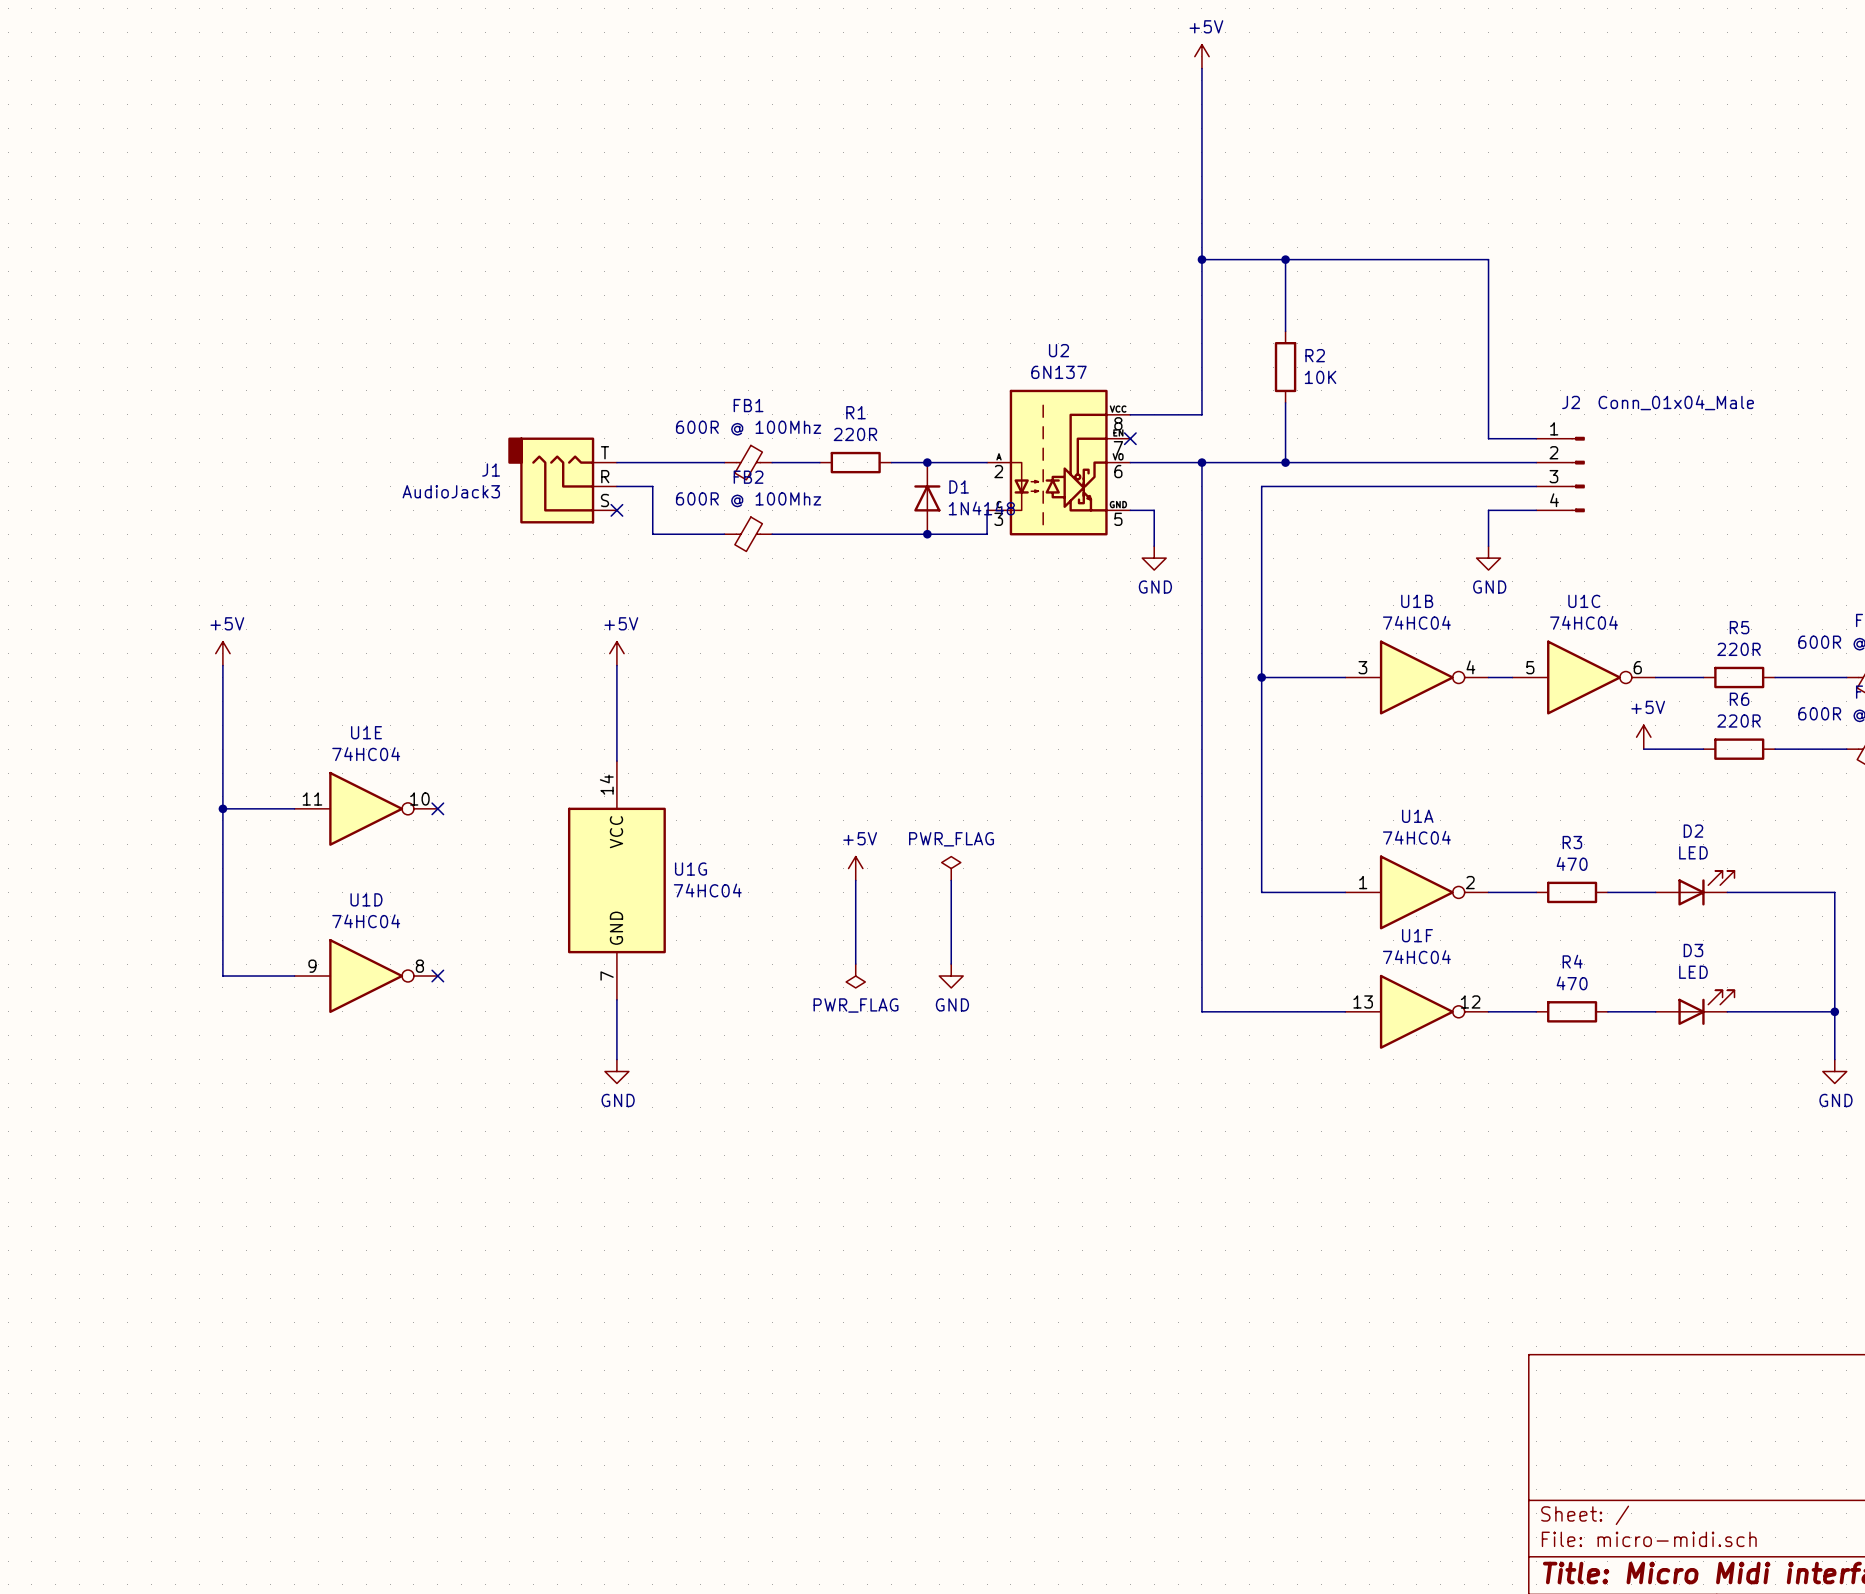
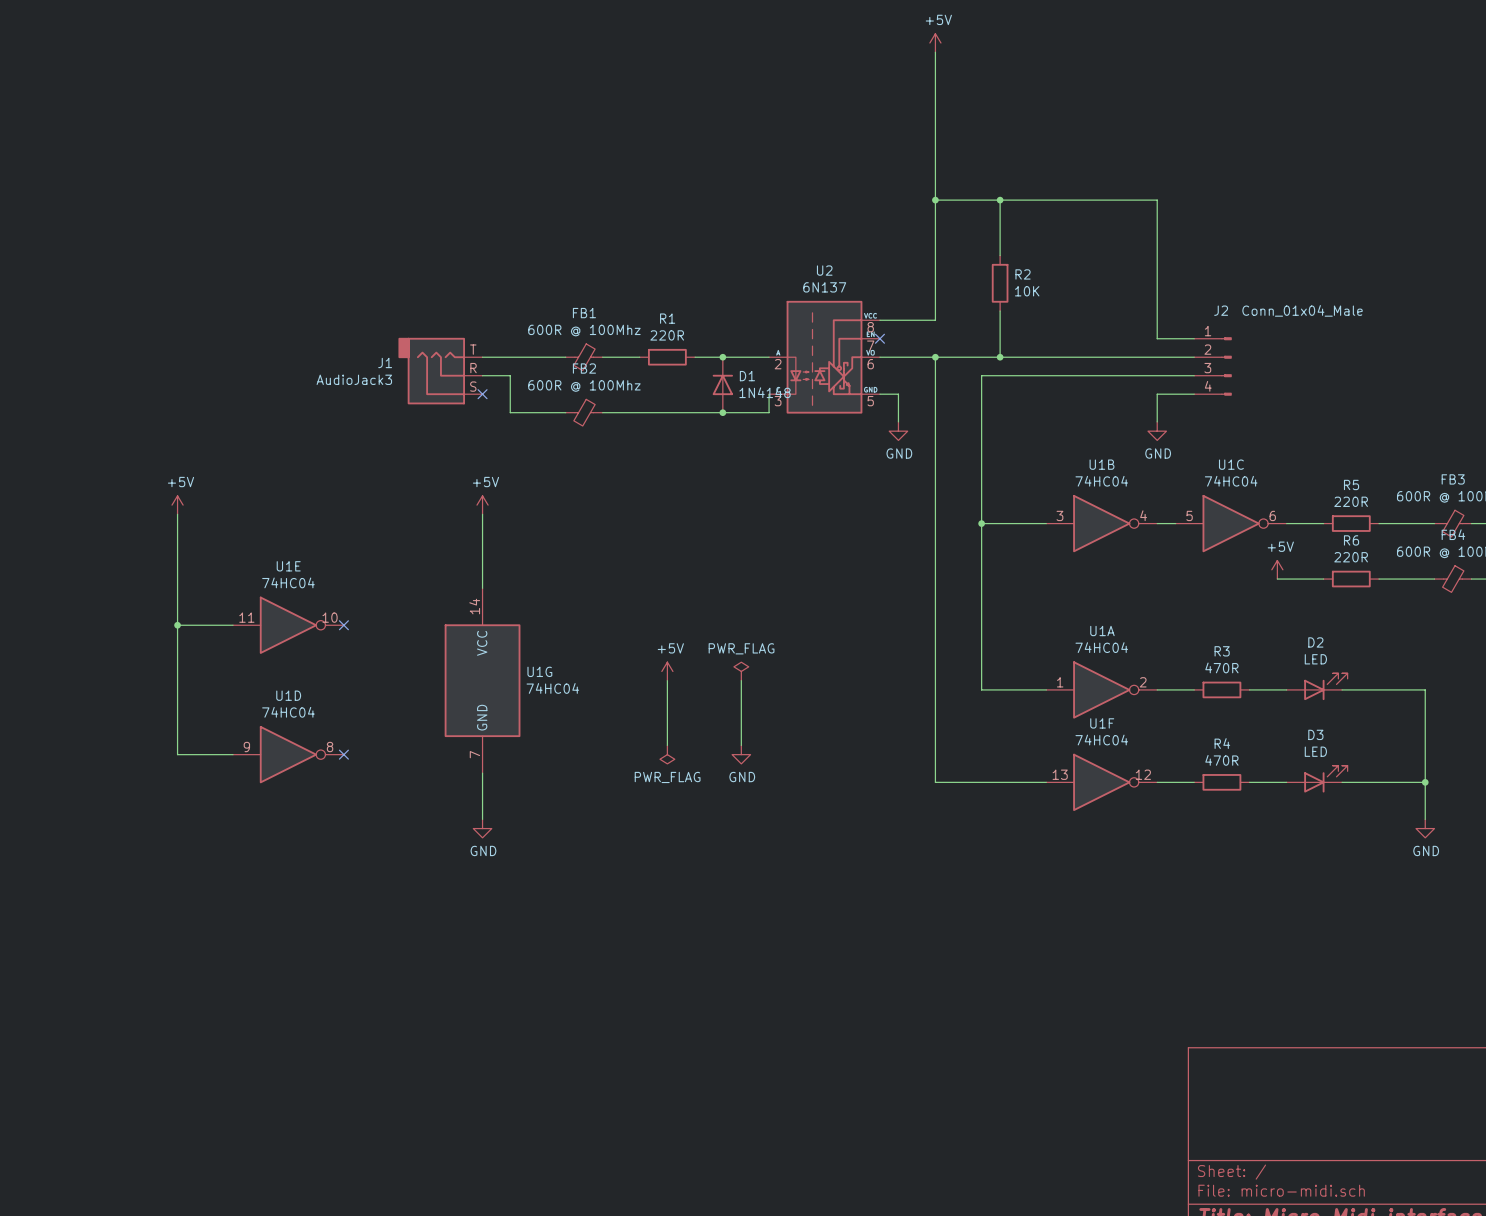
R3 value: 470 (1572, 863) -> 470R (1221, 667)
R4 value: 470 (1572, 983) -> 470R (1221, 760)

